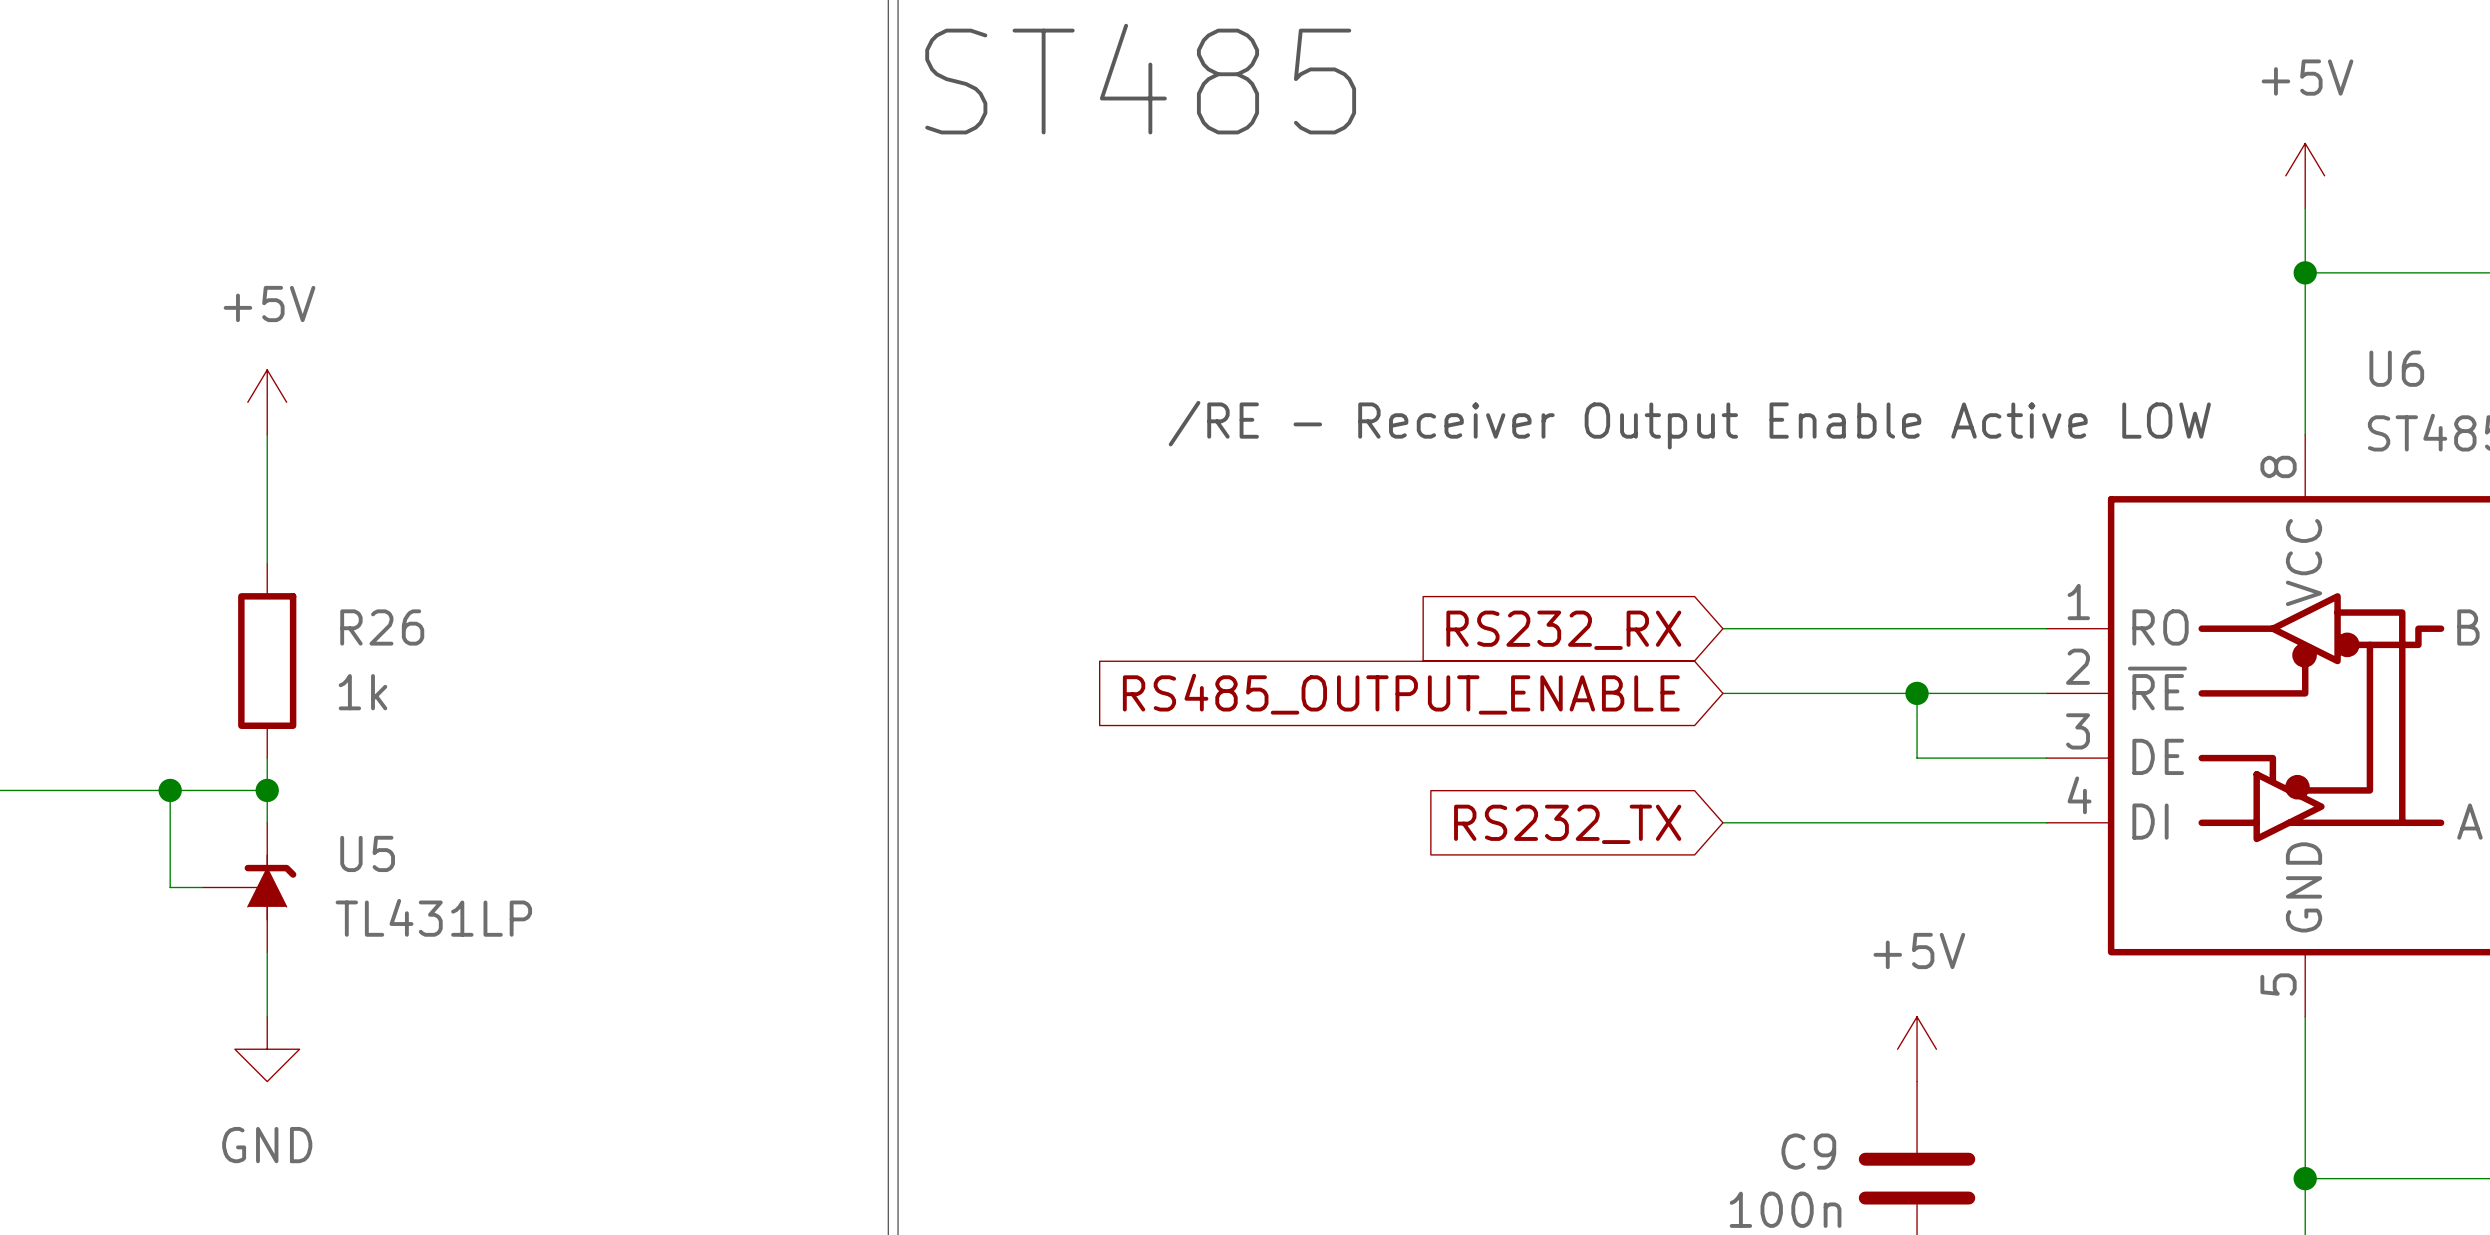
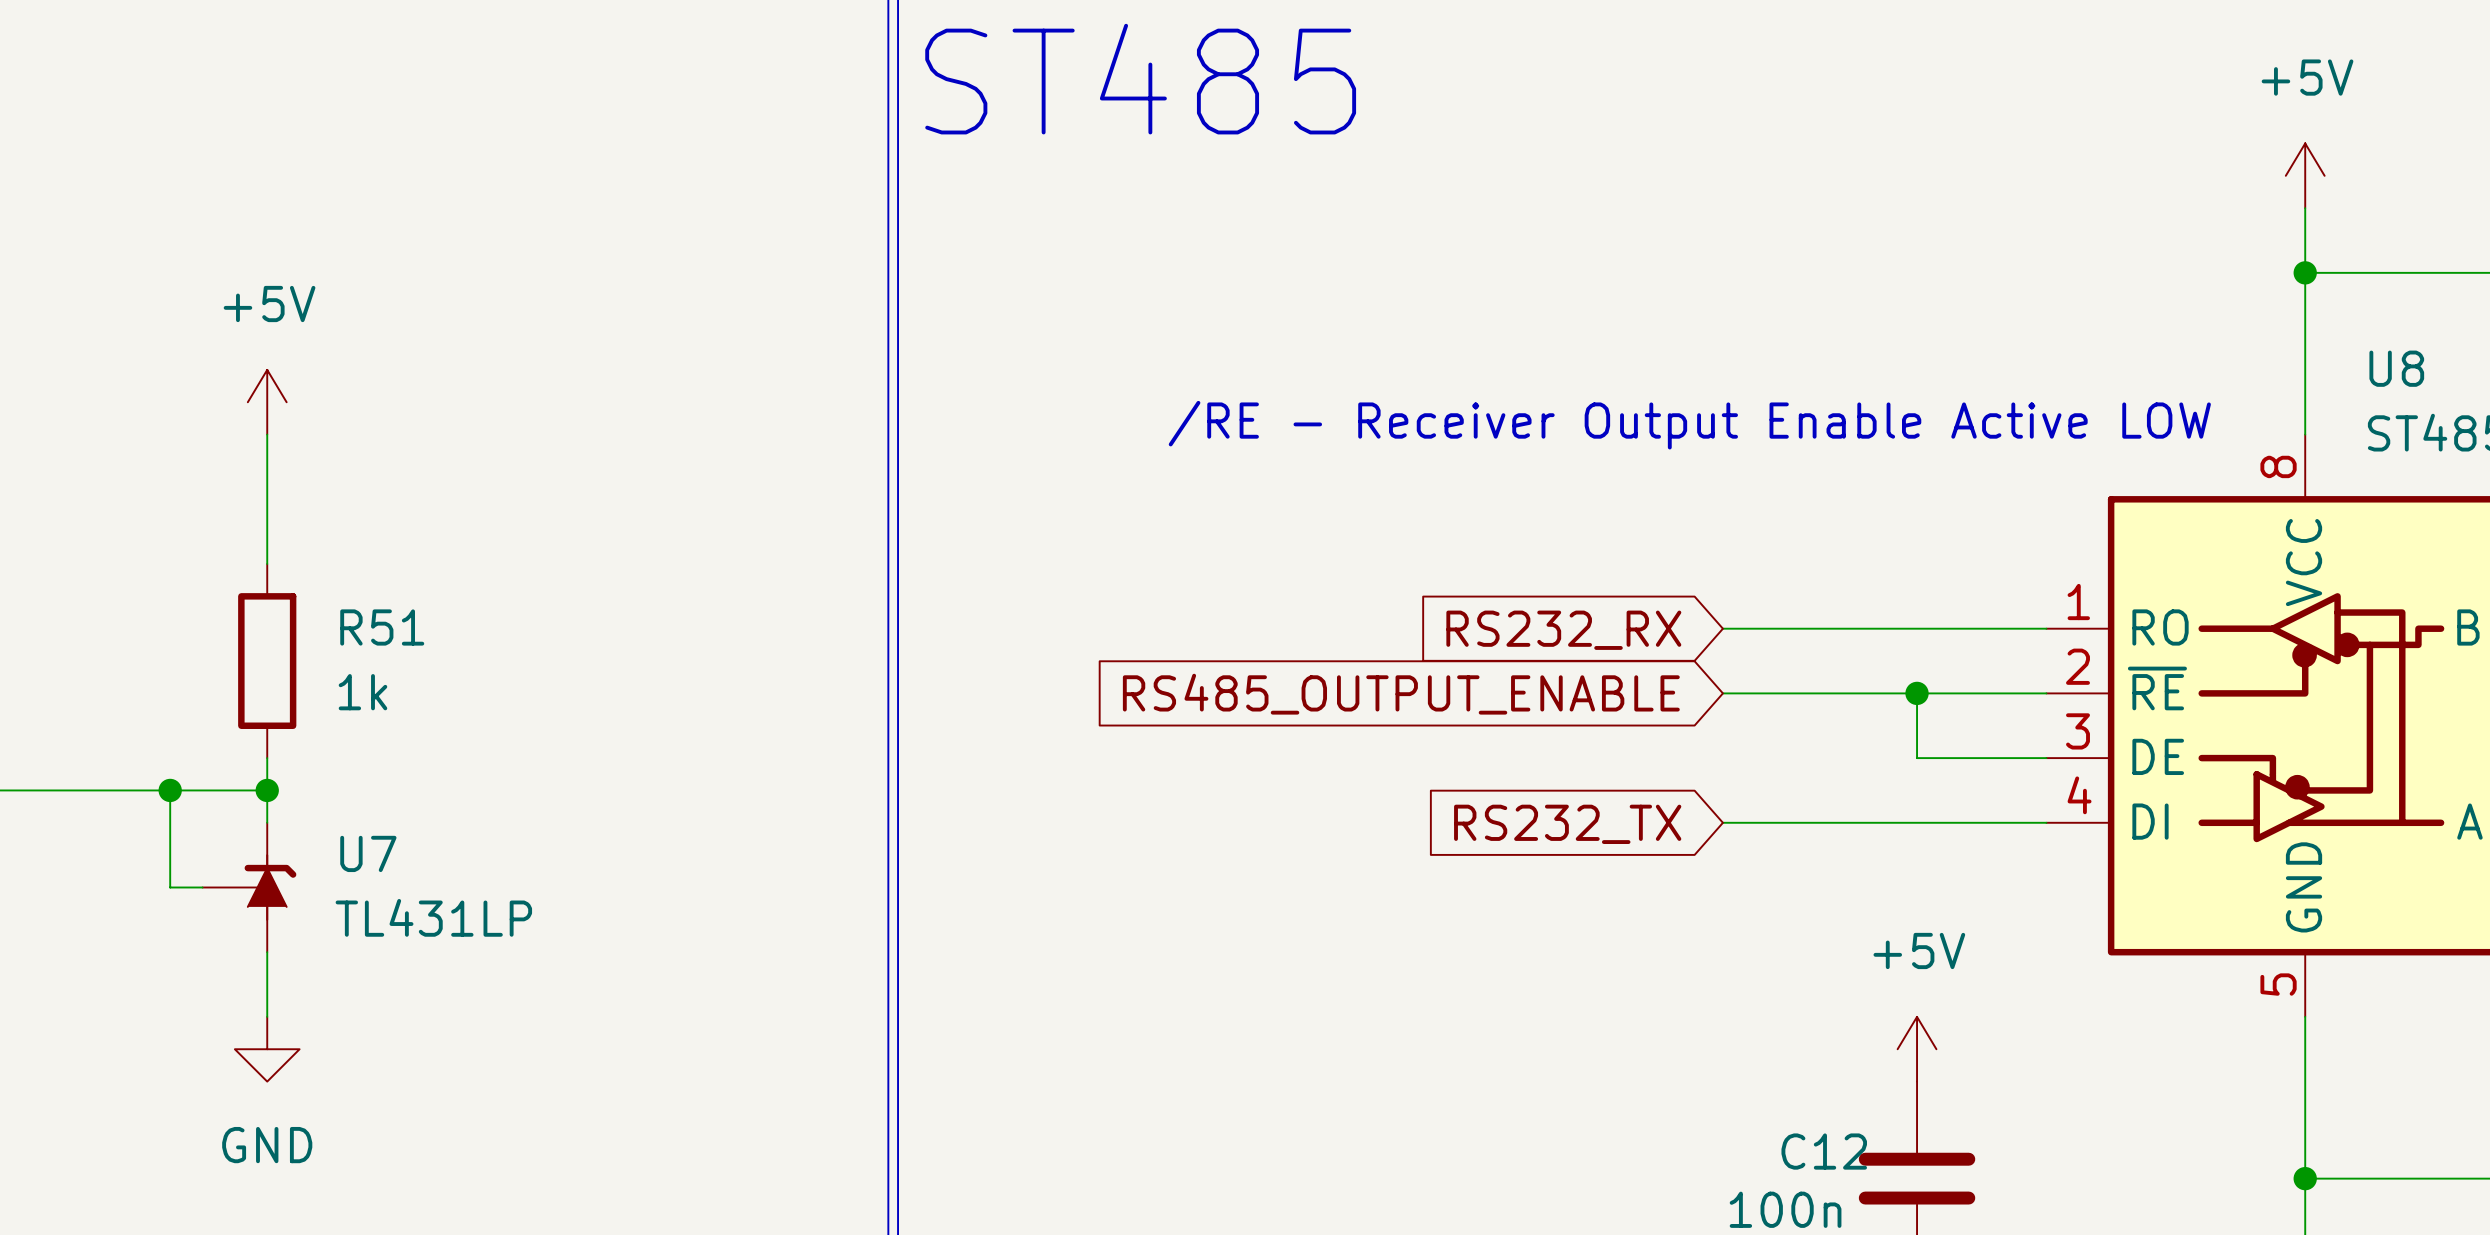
U6 name: U6 (2396, 368) -> U8 (2396, 368)
R26 name: R26 (382, 627) -> R51 (382, 627)
U5 name: U5 (367, 853) -> U7 (368, 853)
C9 name: C9 (1808, 1151) -> C12 (1824, 1151)

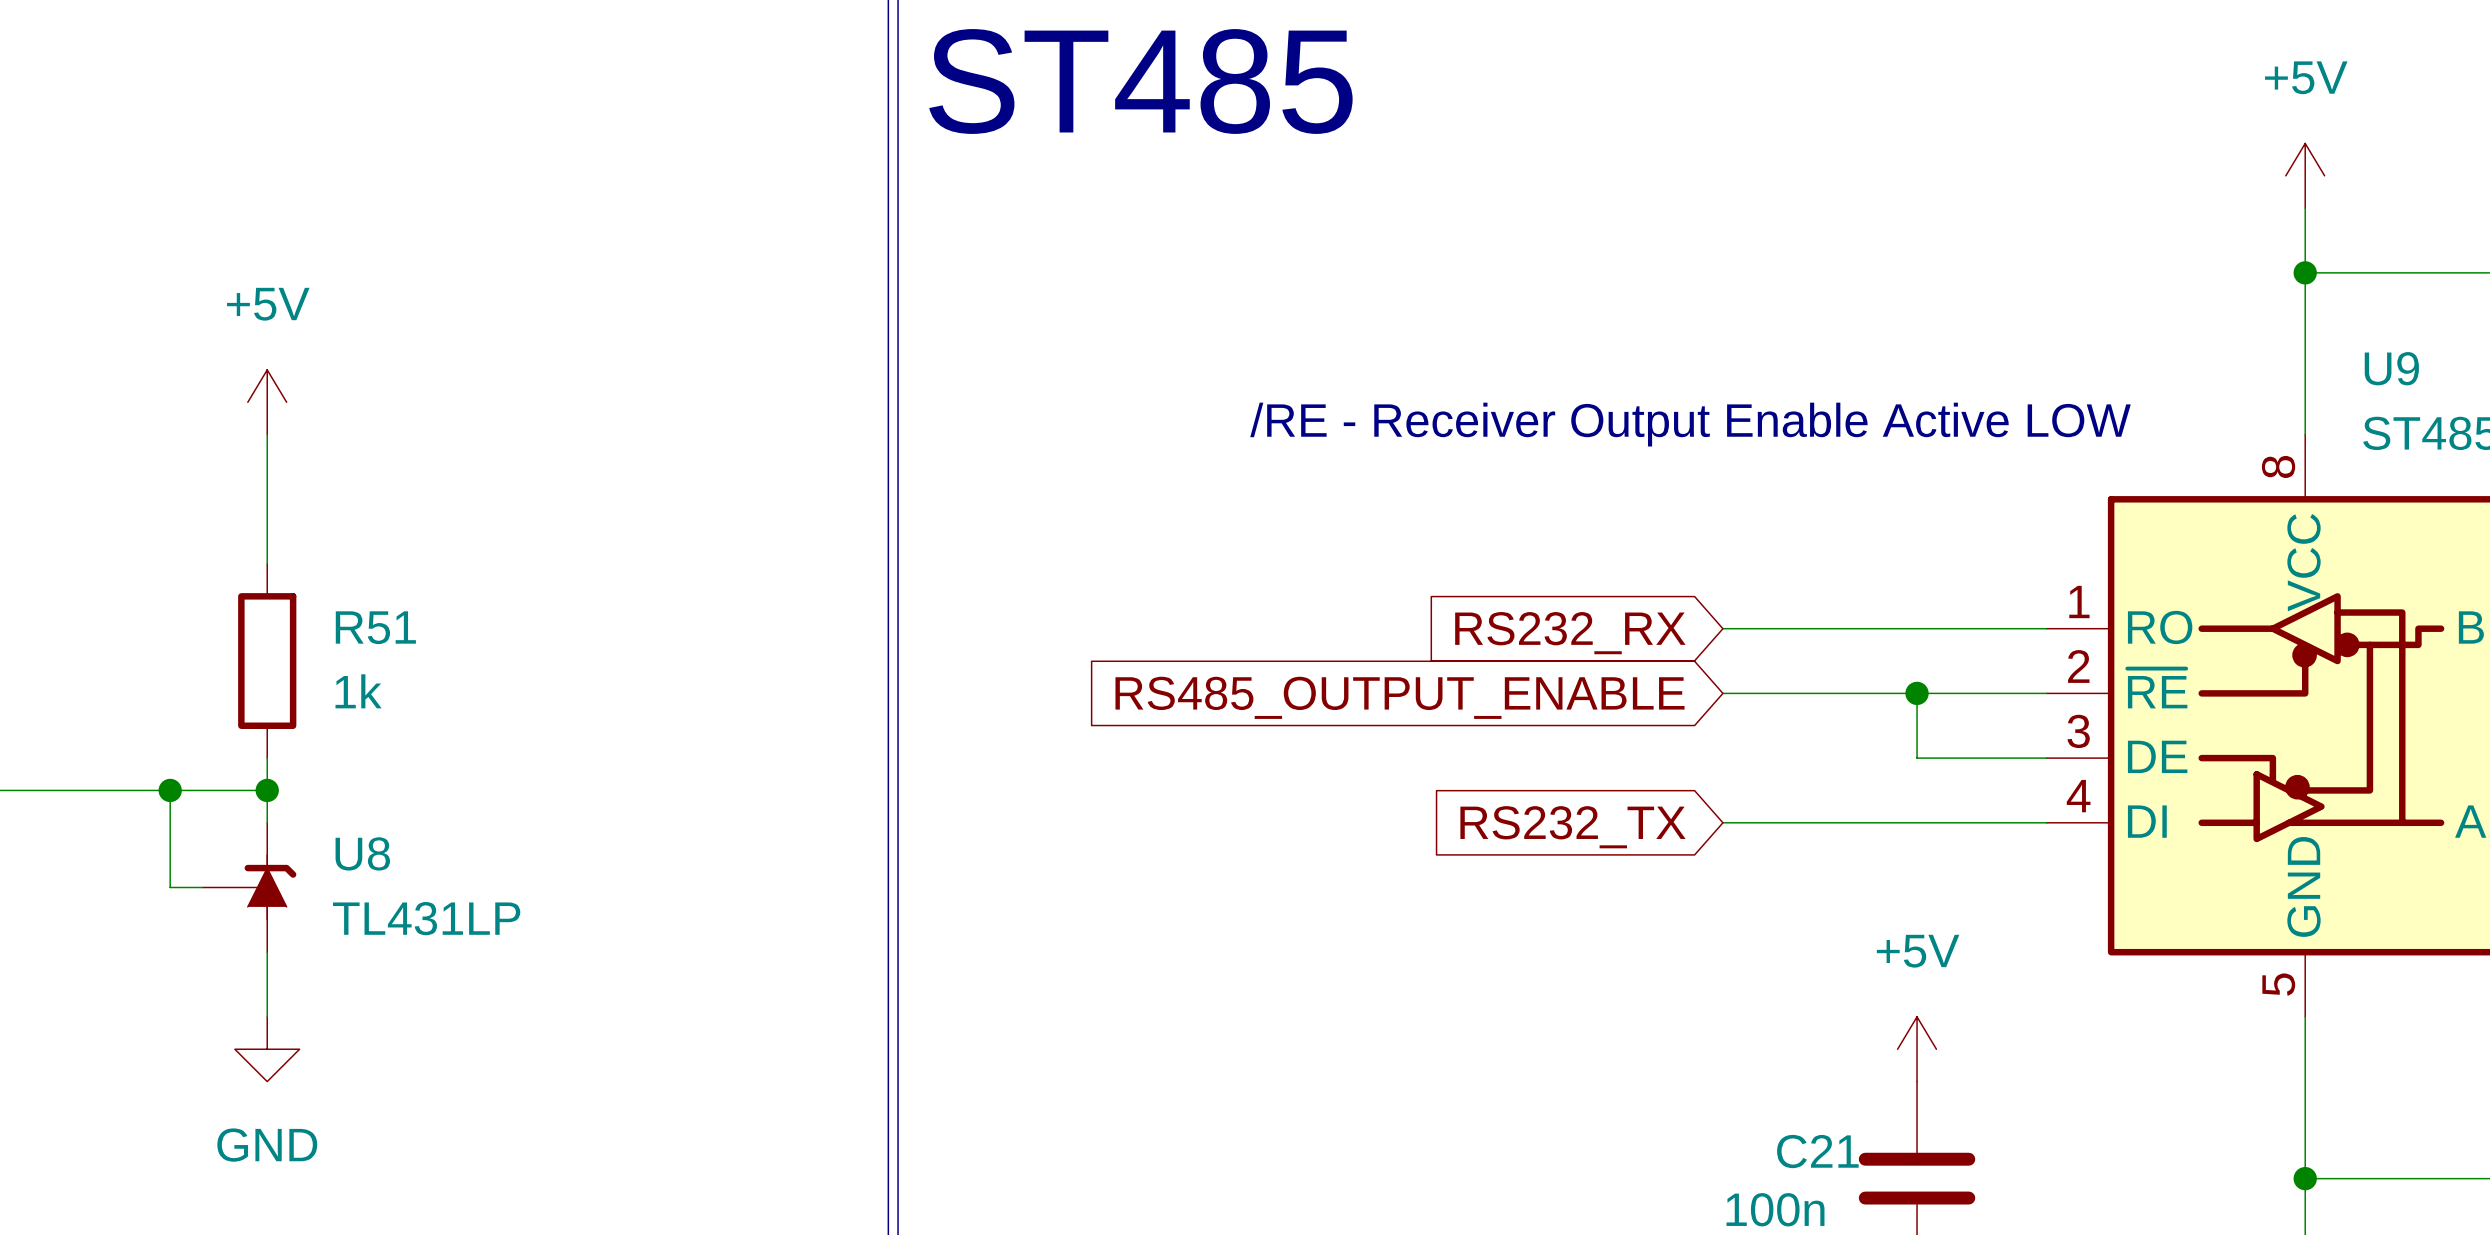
U8 name: U8 (2396, 368) -> U9 (2391, 368)
U7 name: U7 (368, 853) -> U8 (362, 853)
C12 name: C12 (1824, 1151) -> C21 (1817, 1151)

